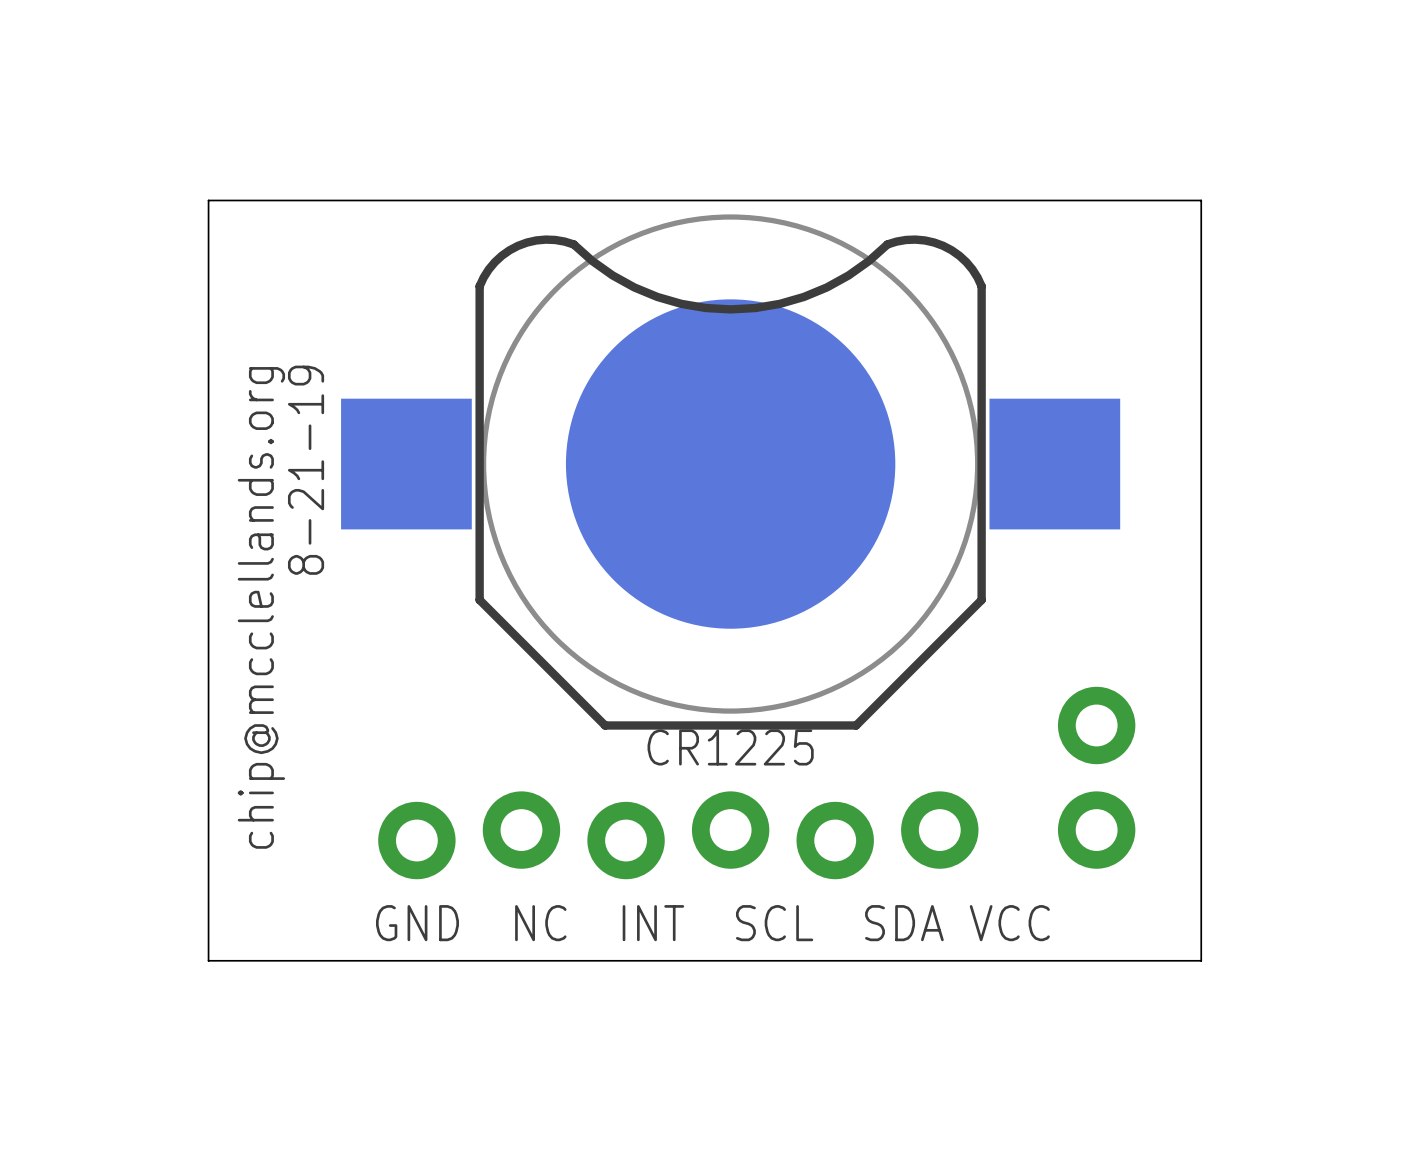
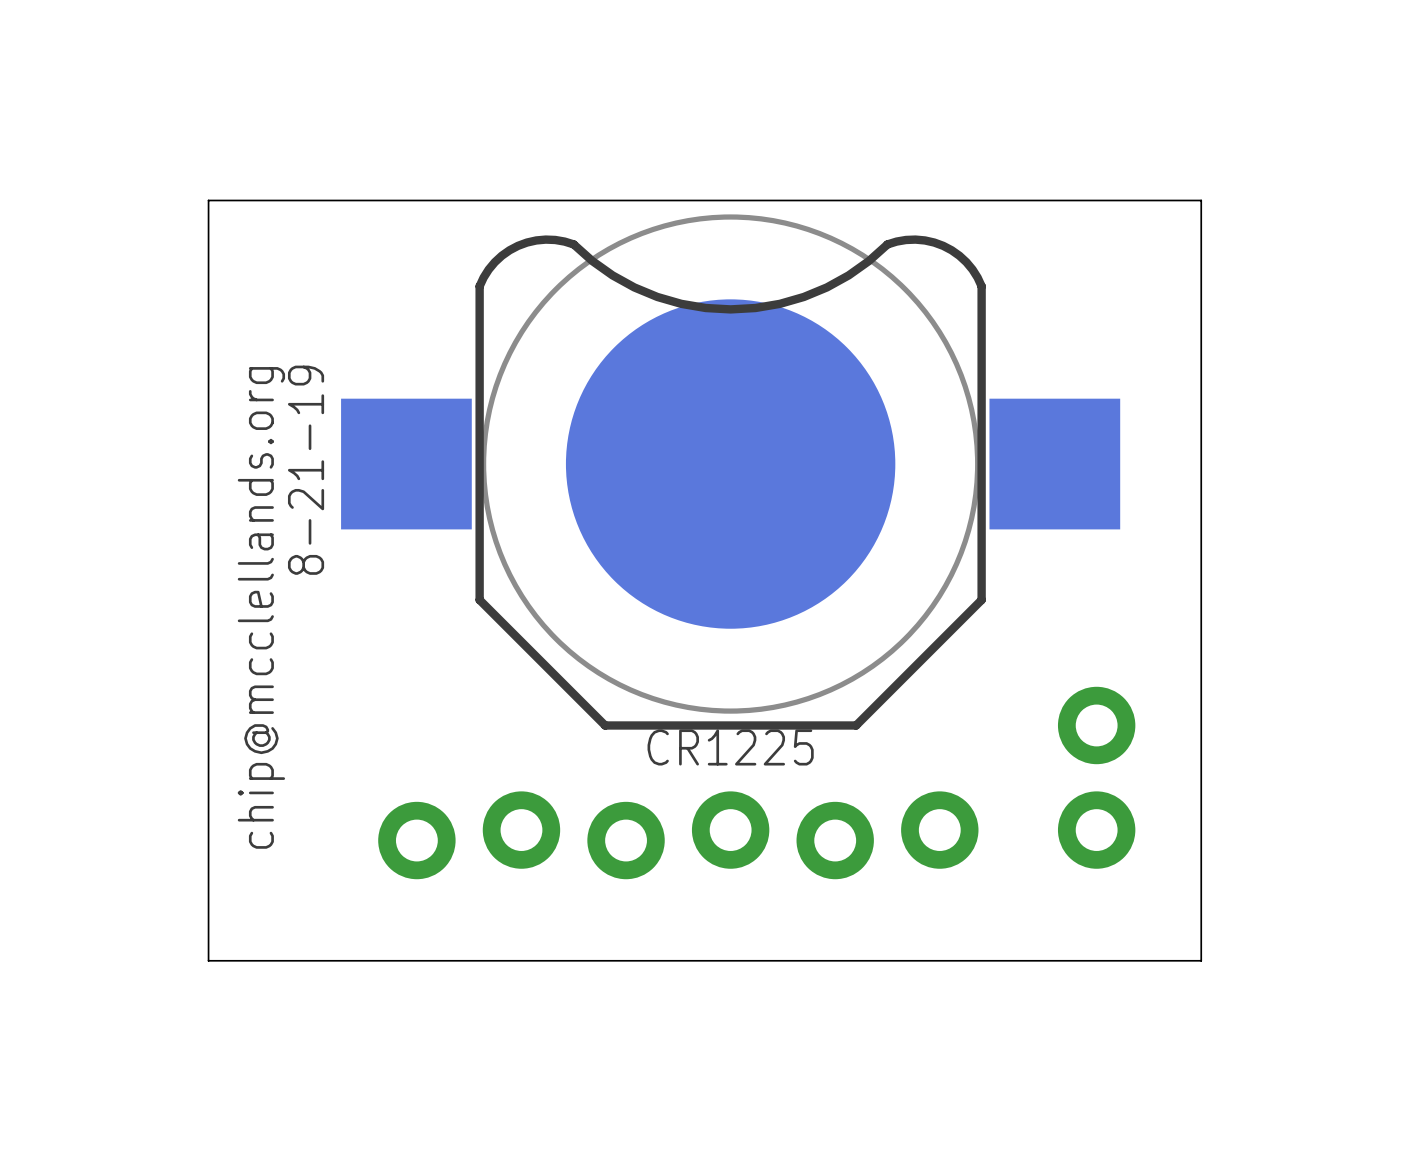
text: GND NC INT SCL SDA VCC (712, 923) -> none

